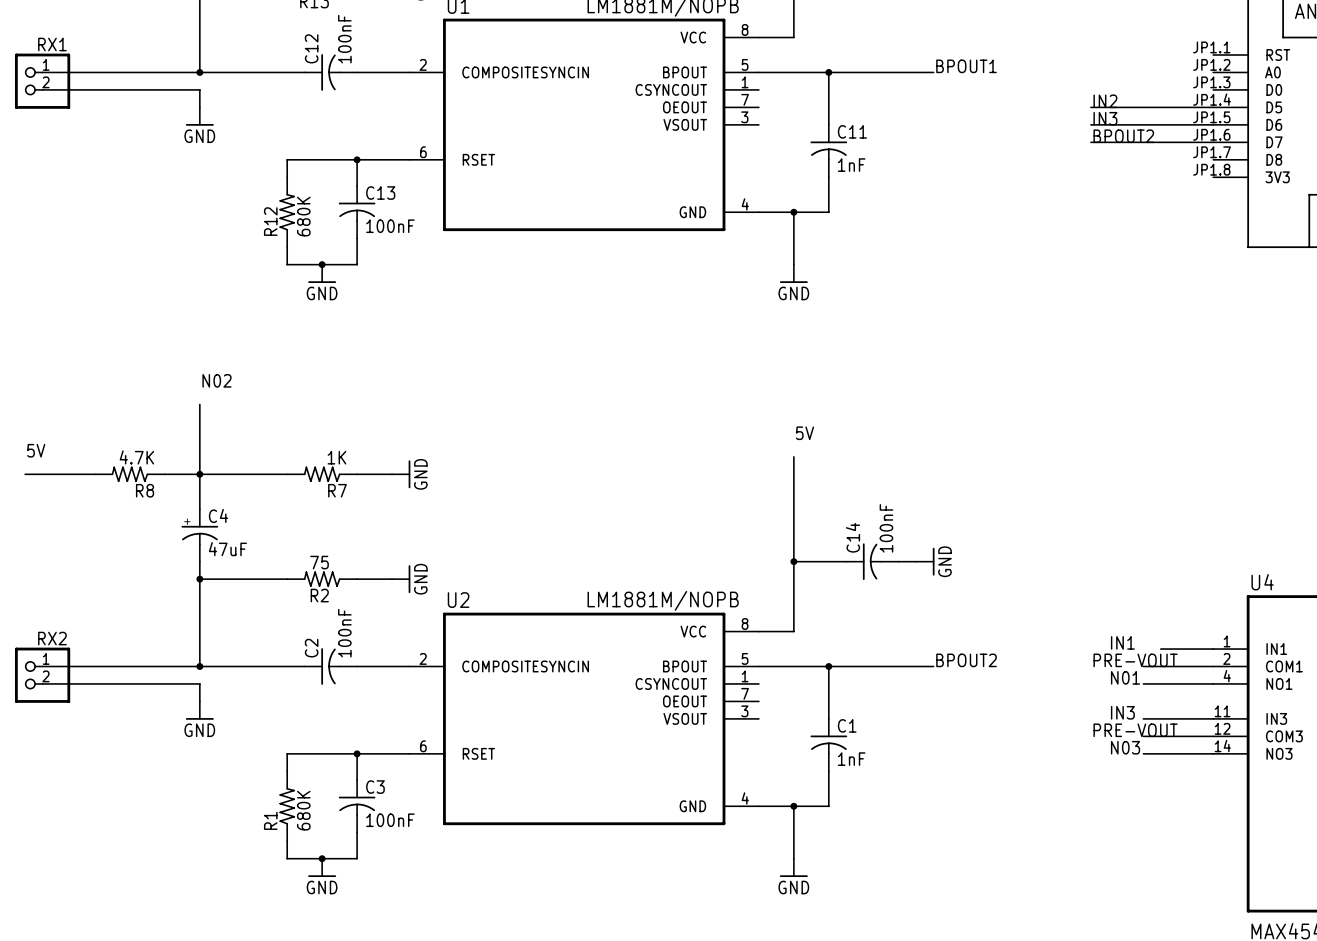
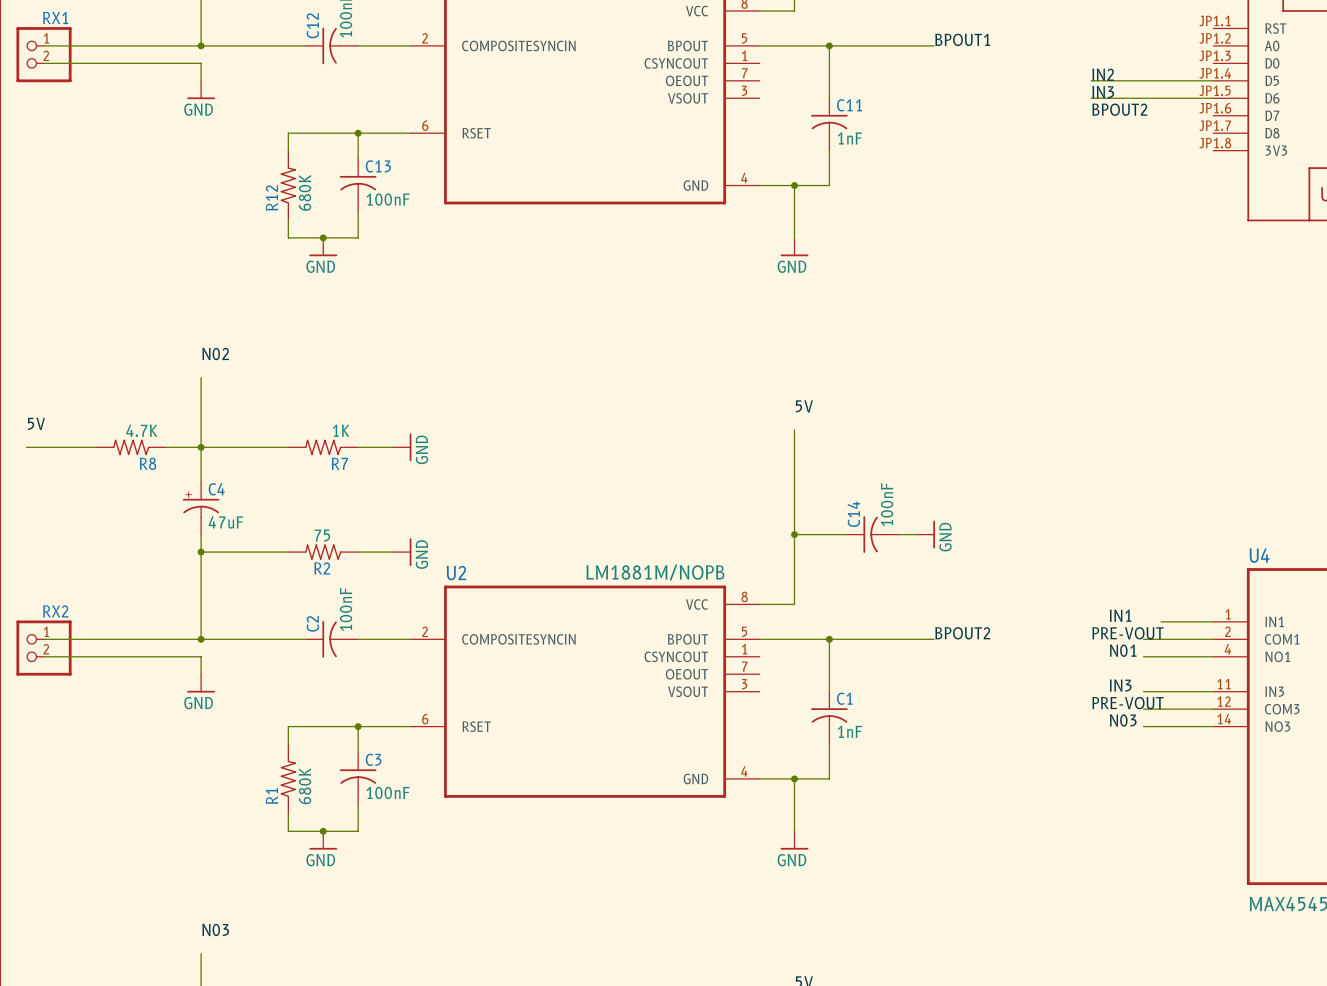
wire: (1090, 142) (1213, 142) -> none

